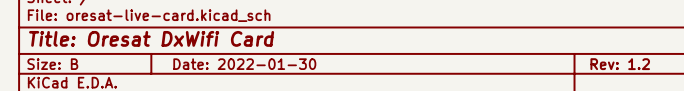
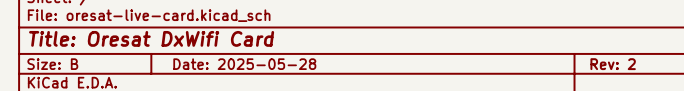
title block: Date: 2022-01-30 (244, 64) -> Date: 2025-05-28 (244, 64)
title block: Rev: 1.2 (620, 64) -> Rev: 2 (613, 64)

